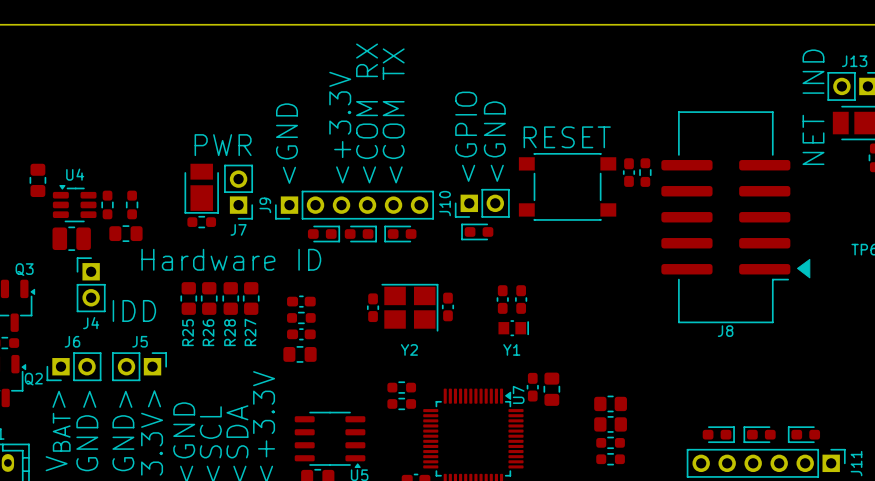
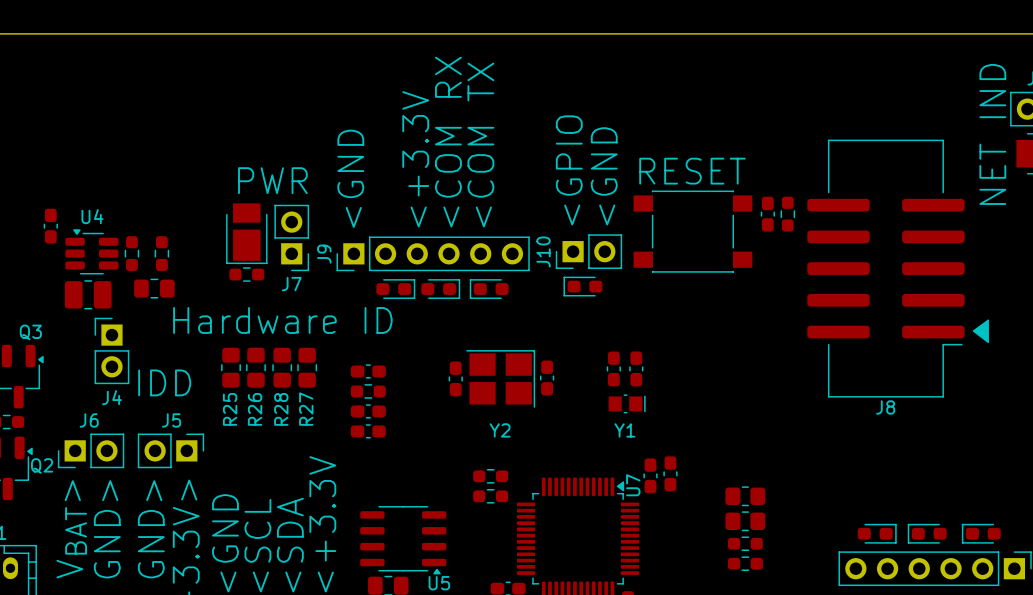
part footprint: [29, 163, 47, 198] -> [43, 208, 58, 244]
part footprint: [283, 346, 317, 363] -> [350, 424, 386, 439]
part footprint: [543, 372, 560, 406] -> [663, 456, 678, 492]

